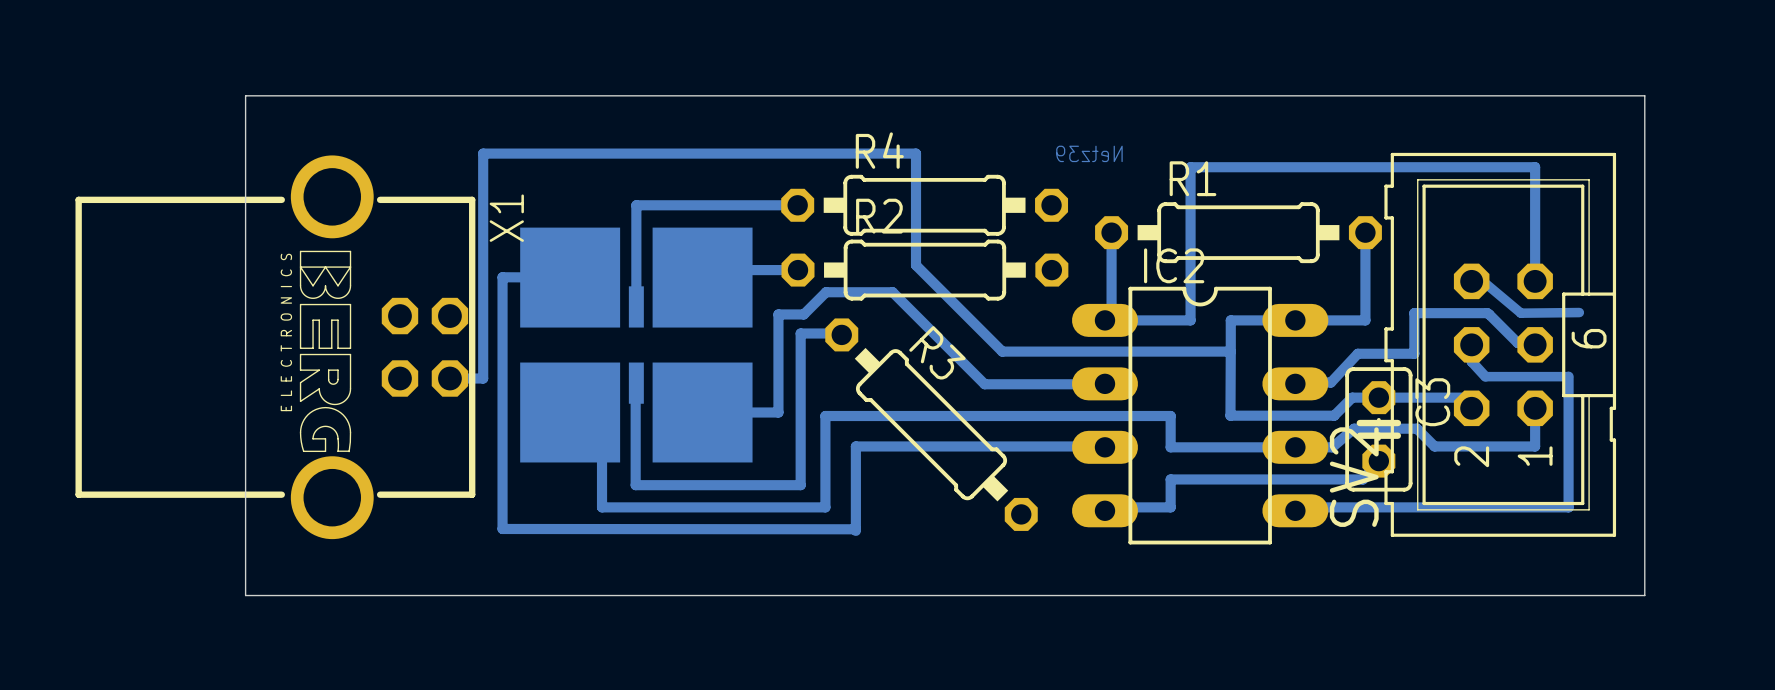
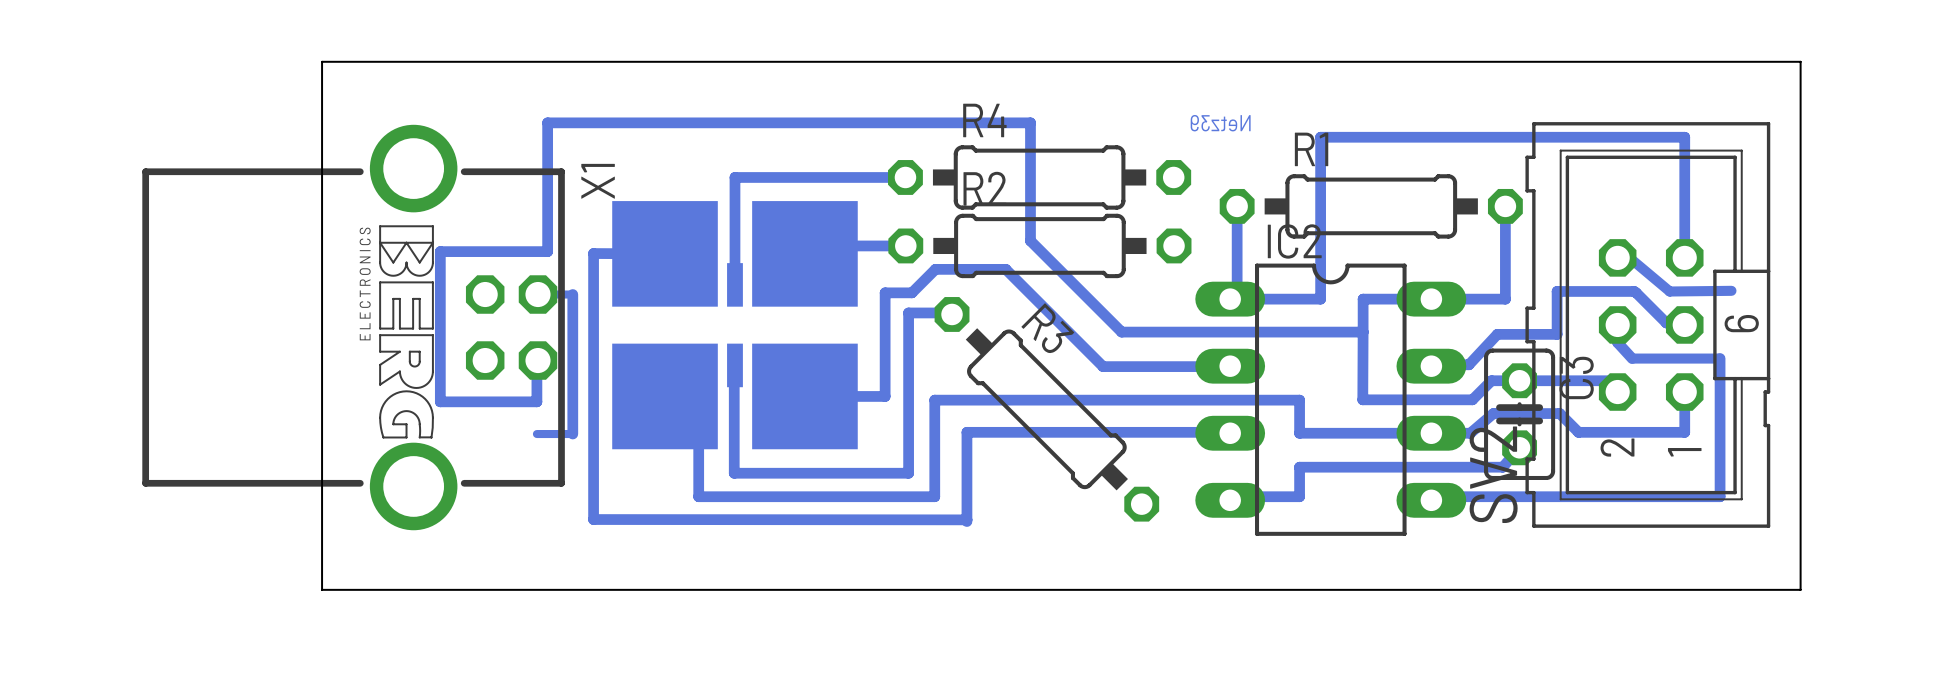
bottom track: (483, 153) (483, 378) (449, 378) -> (573, 122) (547, 122) (547, 251) (440, 251) (440, 401) (536, 401) (536, 360)
bottom track: none -> (538, 294) (572, 294) (572, 434) (536, 434)

